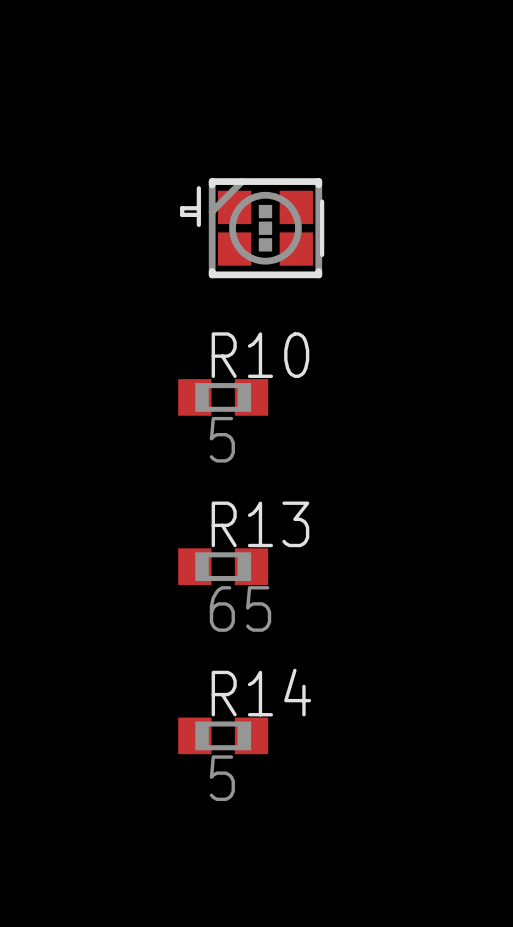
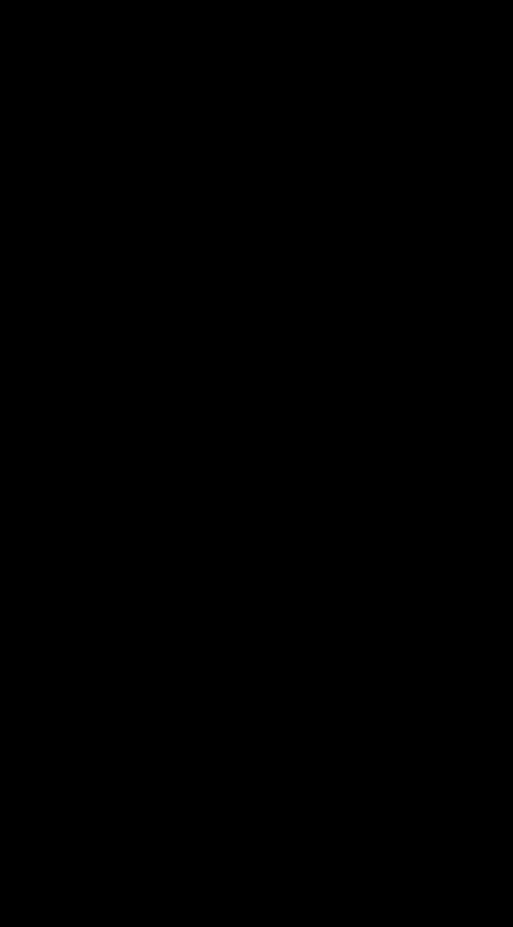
part: (252, 228) -> none
R10: 5 (223, 397) -> none
R13: 65 (223, 566) -> none
R14: 5 (223, 735) -> none

